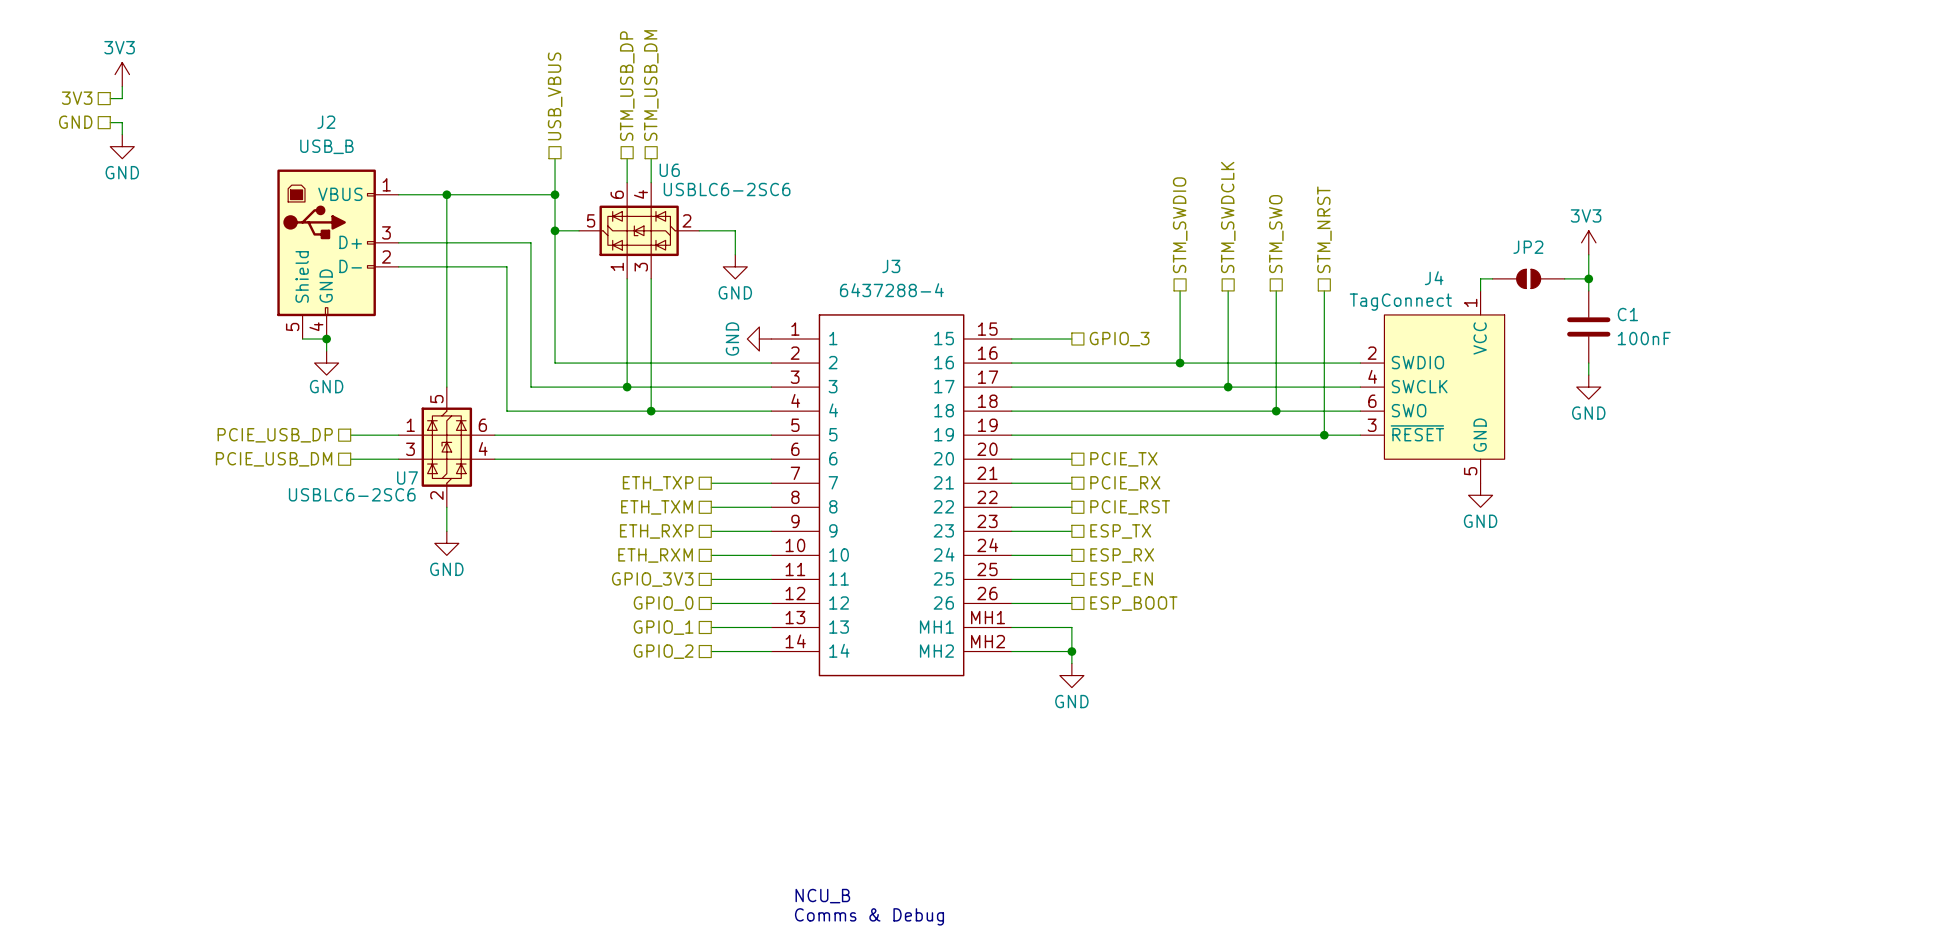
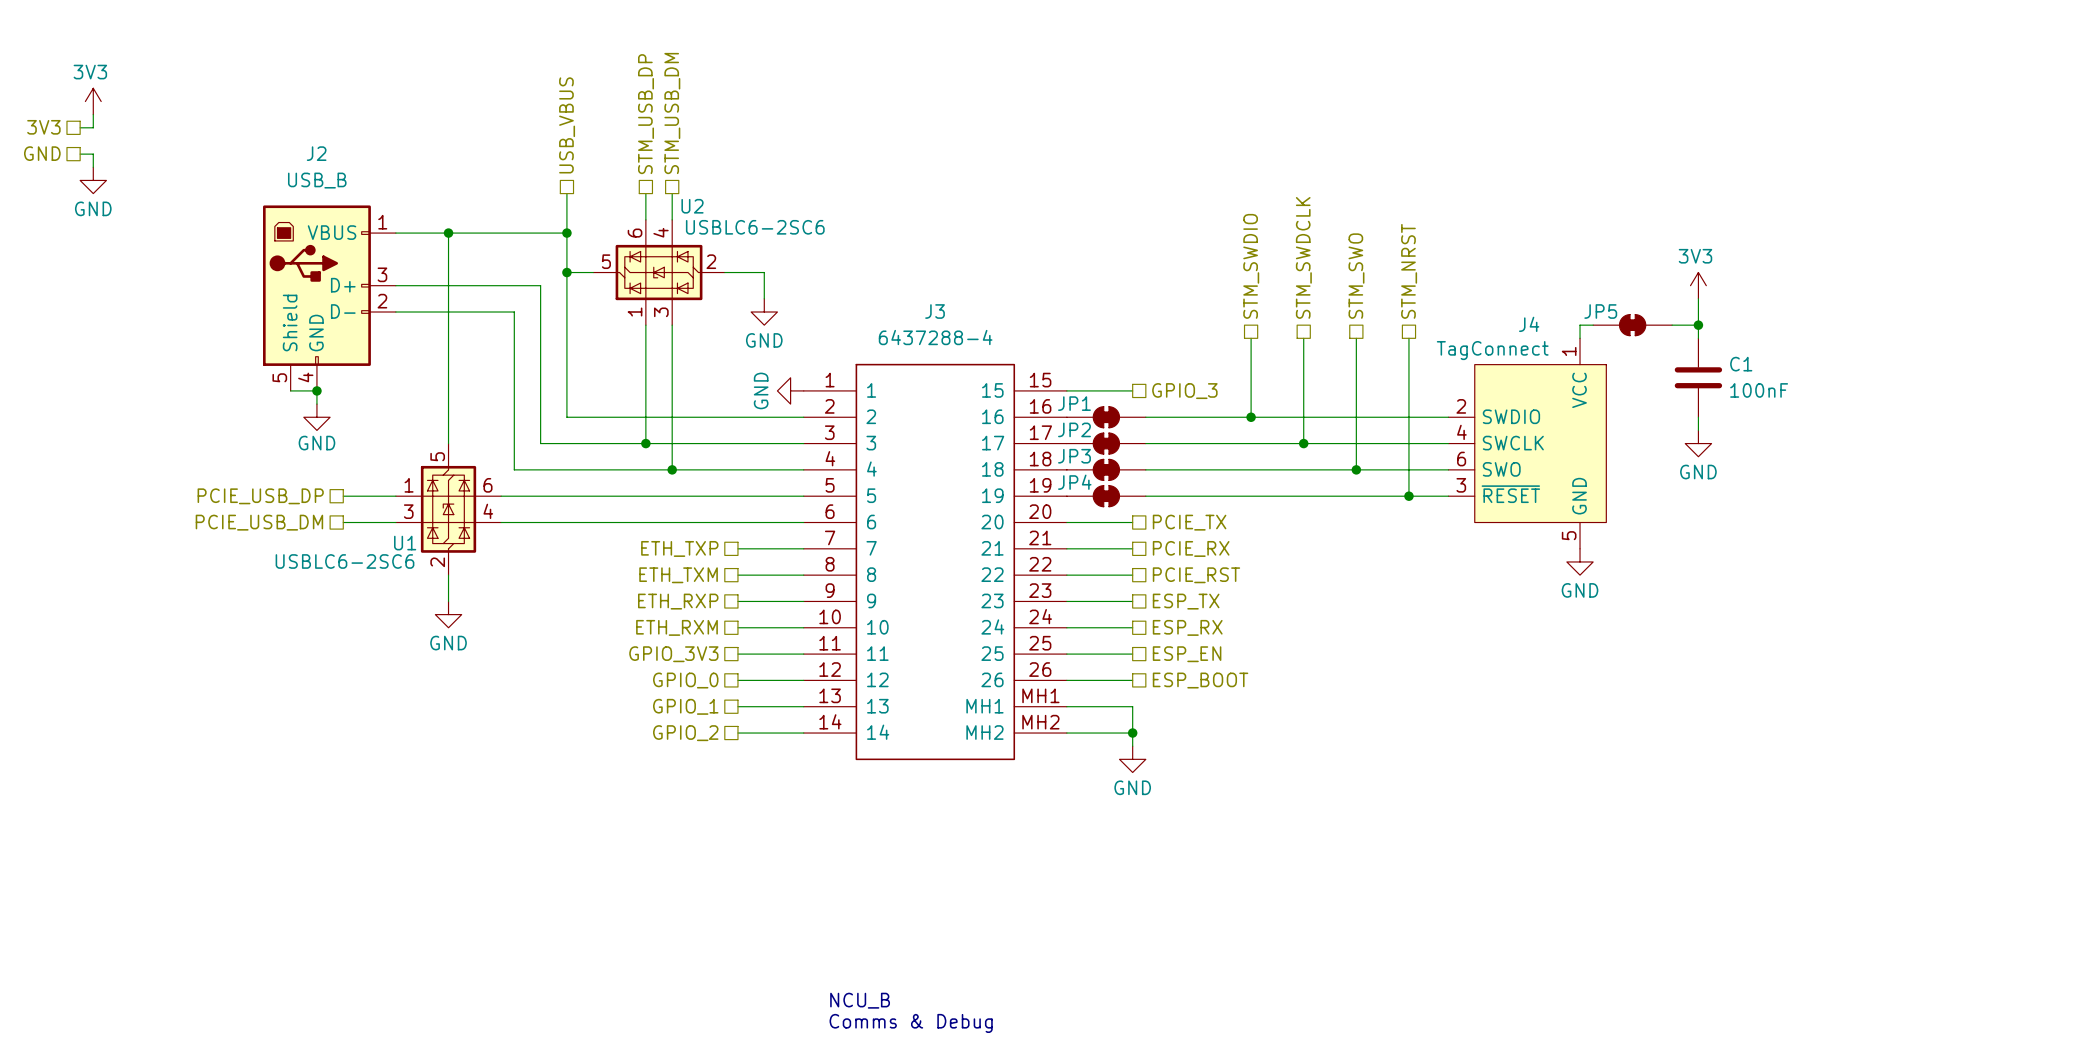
U6 name: U6 (669, 170) -> U2 (692, 206)
JP2 name position: JP2 (1528, 247) -> JP2 (1074, 429)
JP2 symbol: [1492, 269, 1565, 289] -> [1066, 433, 1146, 455]
JP5: none -> (1632, 325)
JP1: none -> (1106, 417)
JP3: none -> (1106, 469)
JP4: none -> (1106, 496)
U7 name: U7 (407, 477) -> U1 (405, 543)

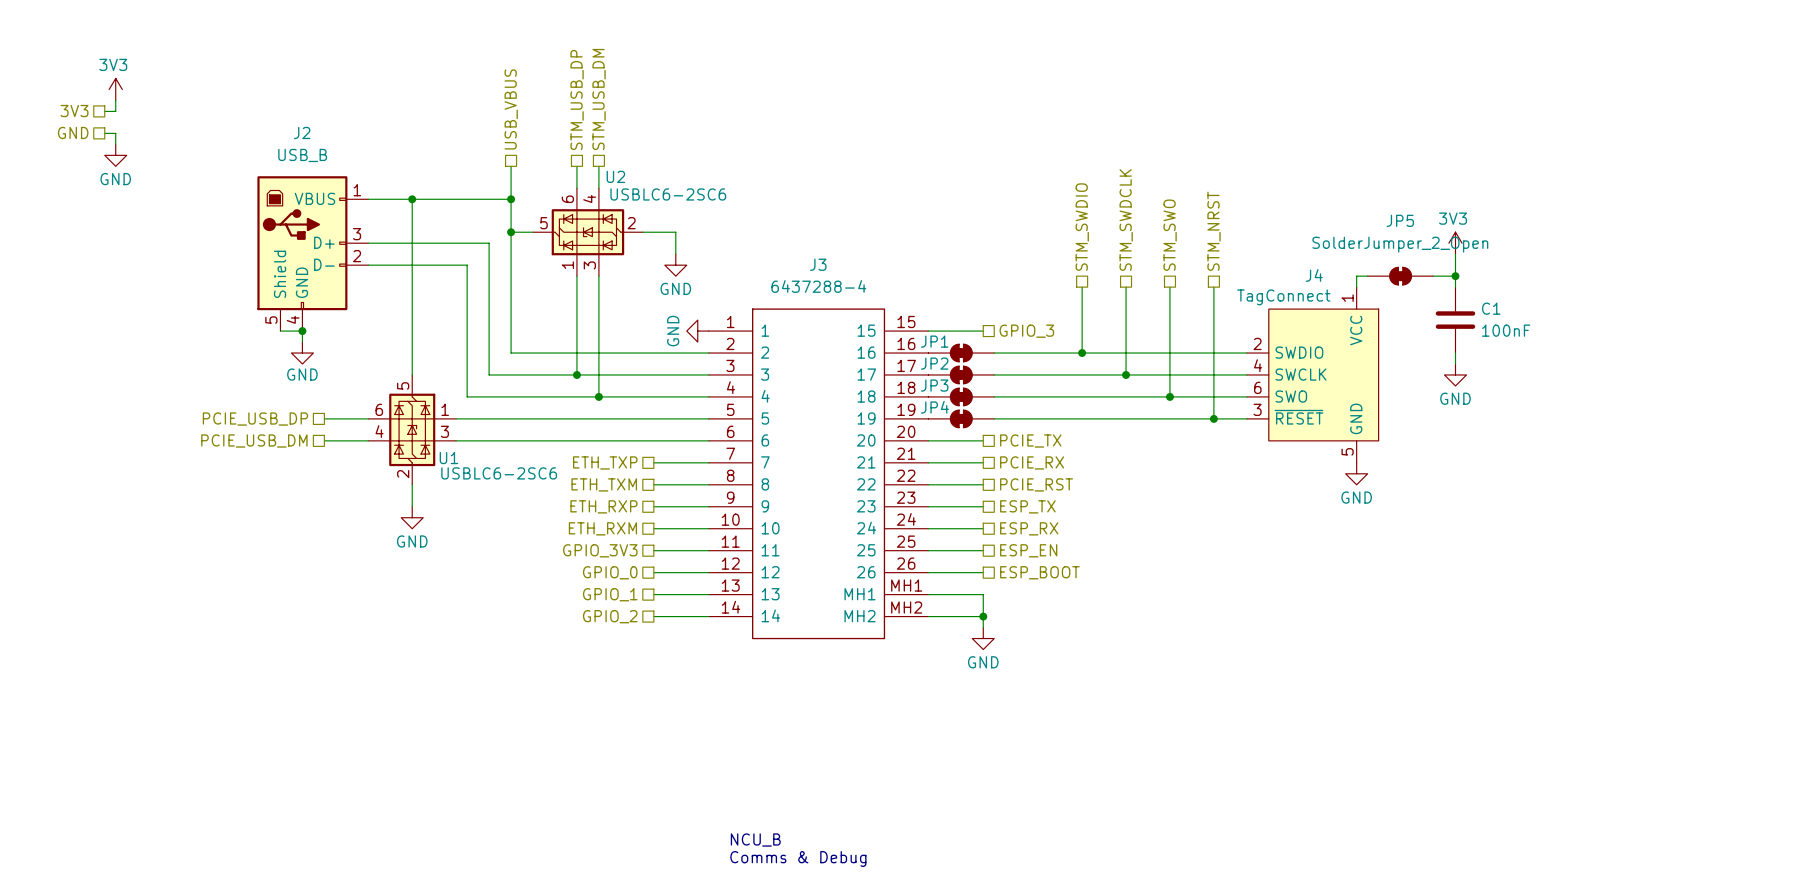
JP5 value: none -> SolderJumper_2_Open (1400, 244)
JP5 name position: JP5 (1600, 311) -> JP5 (1400, 220)
U1 flip: as is (448, 509) -> left-right (412, 429)

